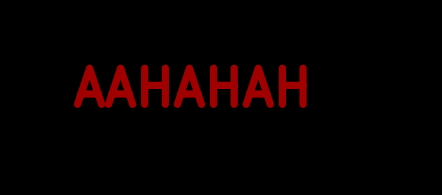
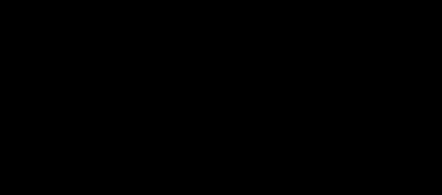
text: AAHAHAH (190, 86) -> none

